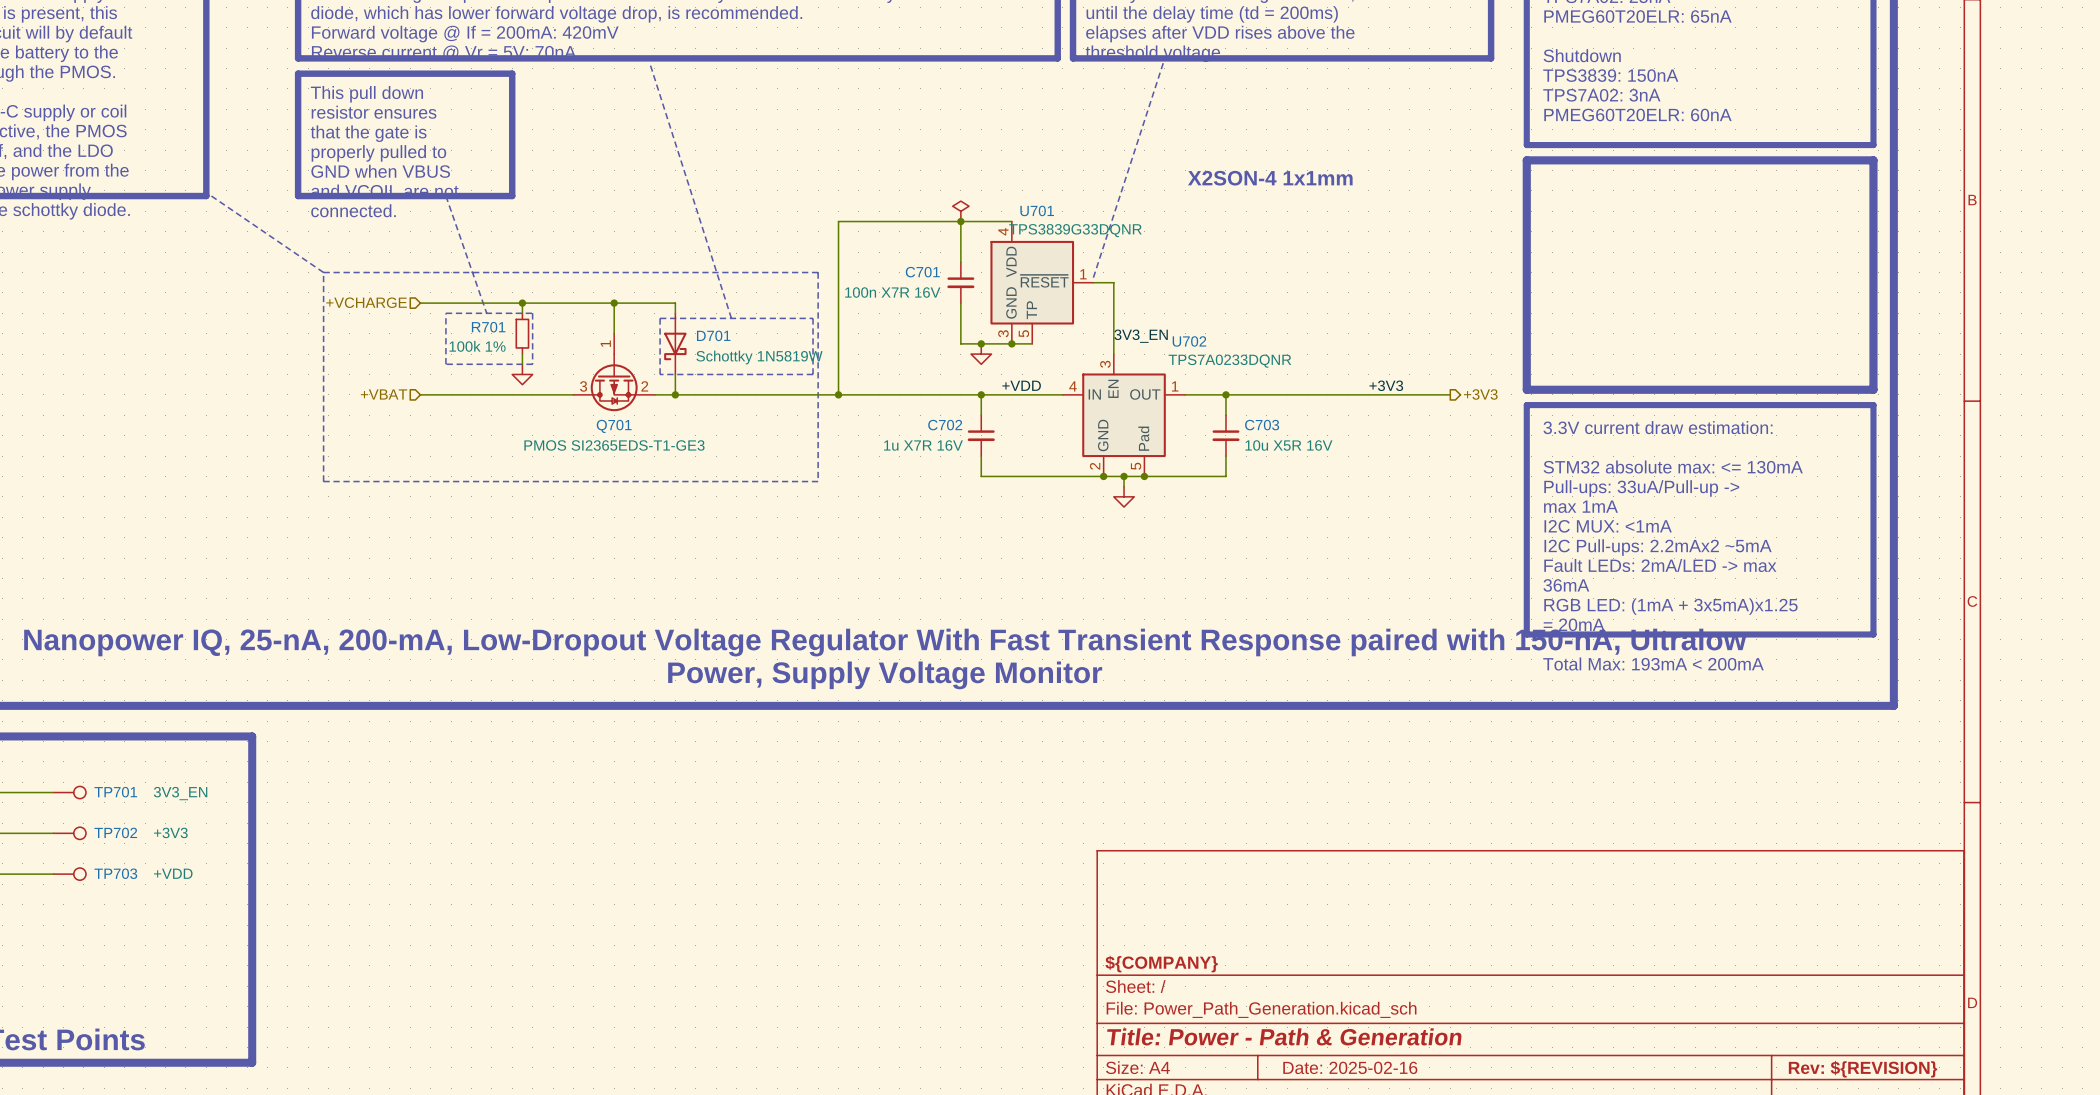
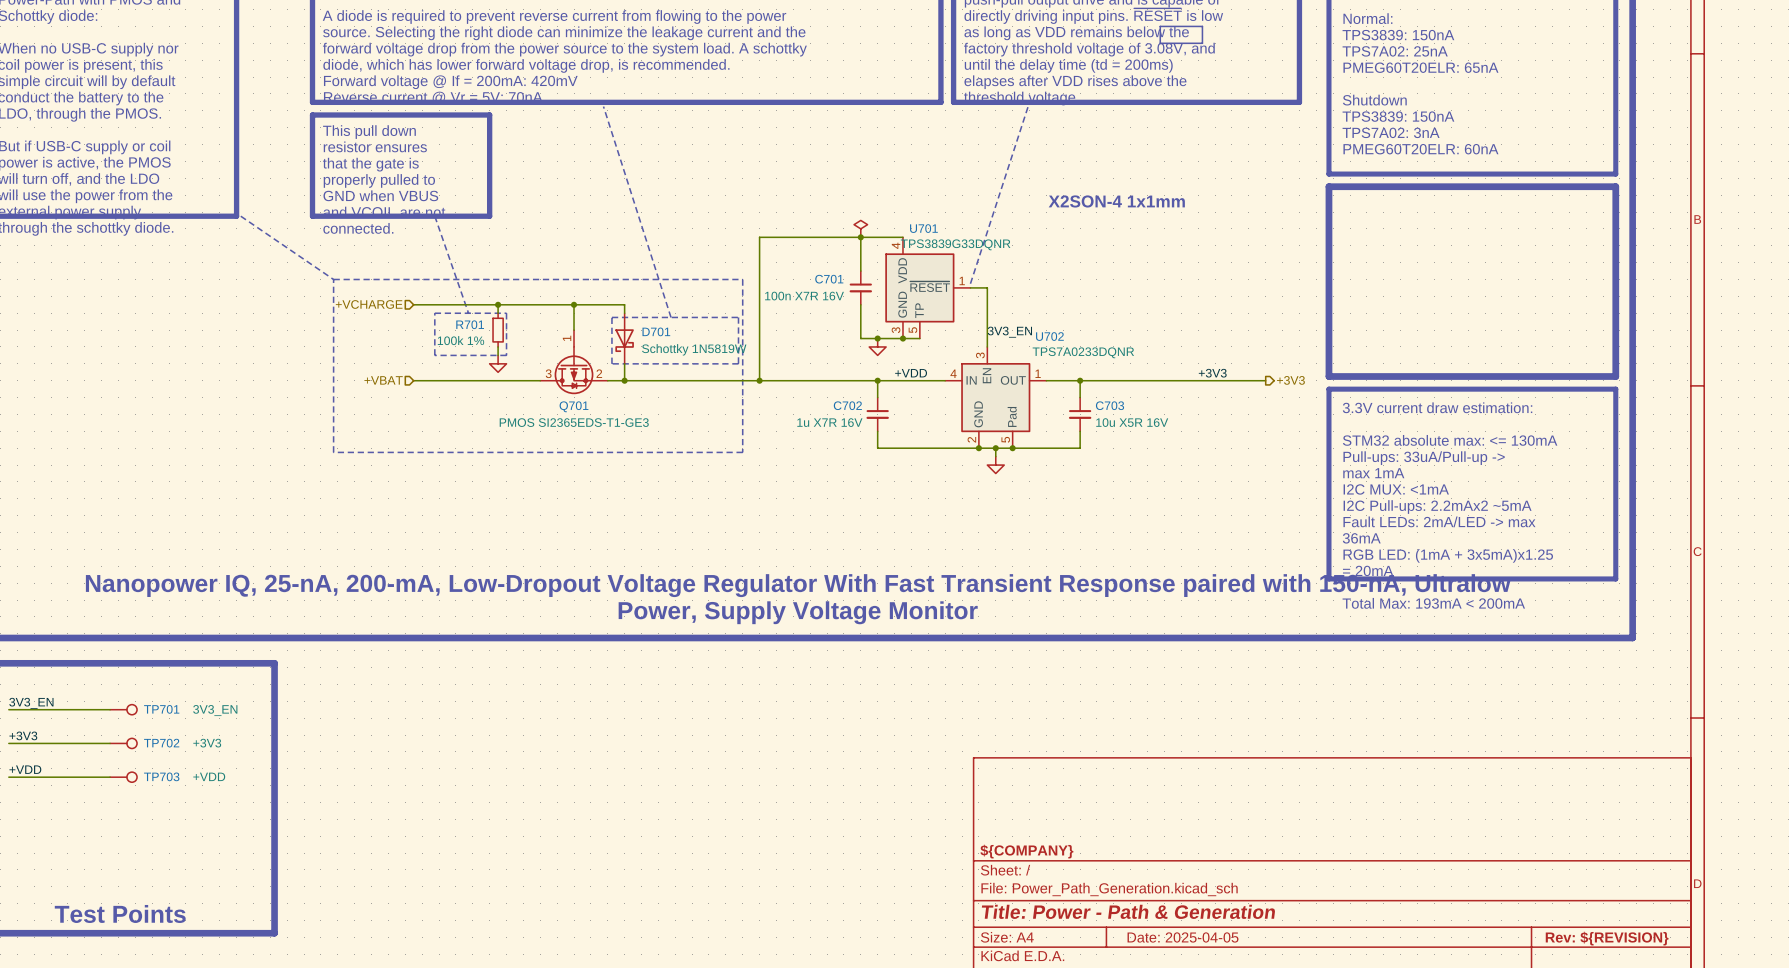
title block: Date: 2025-02-16 (1350, 1067) -> Date: 2025-04-05 (1183, 937)

